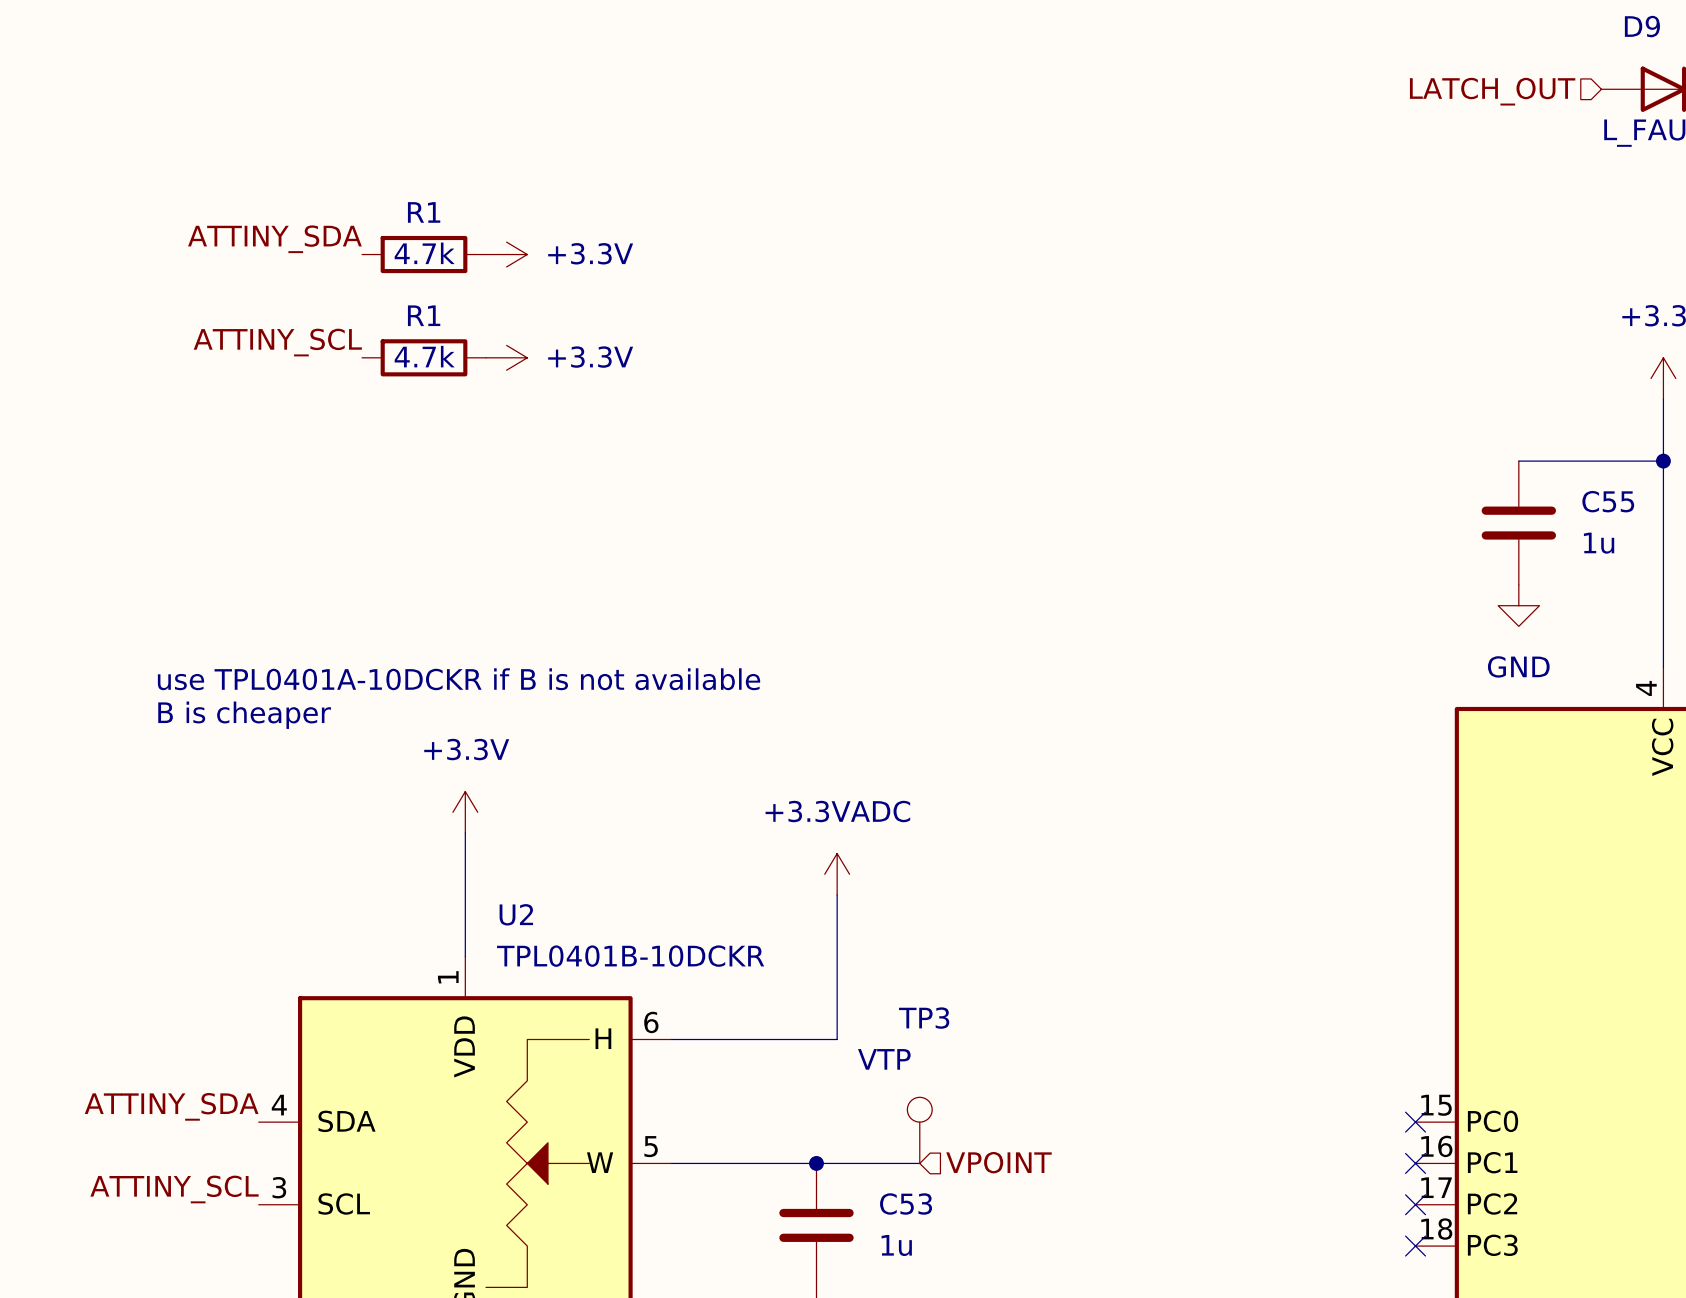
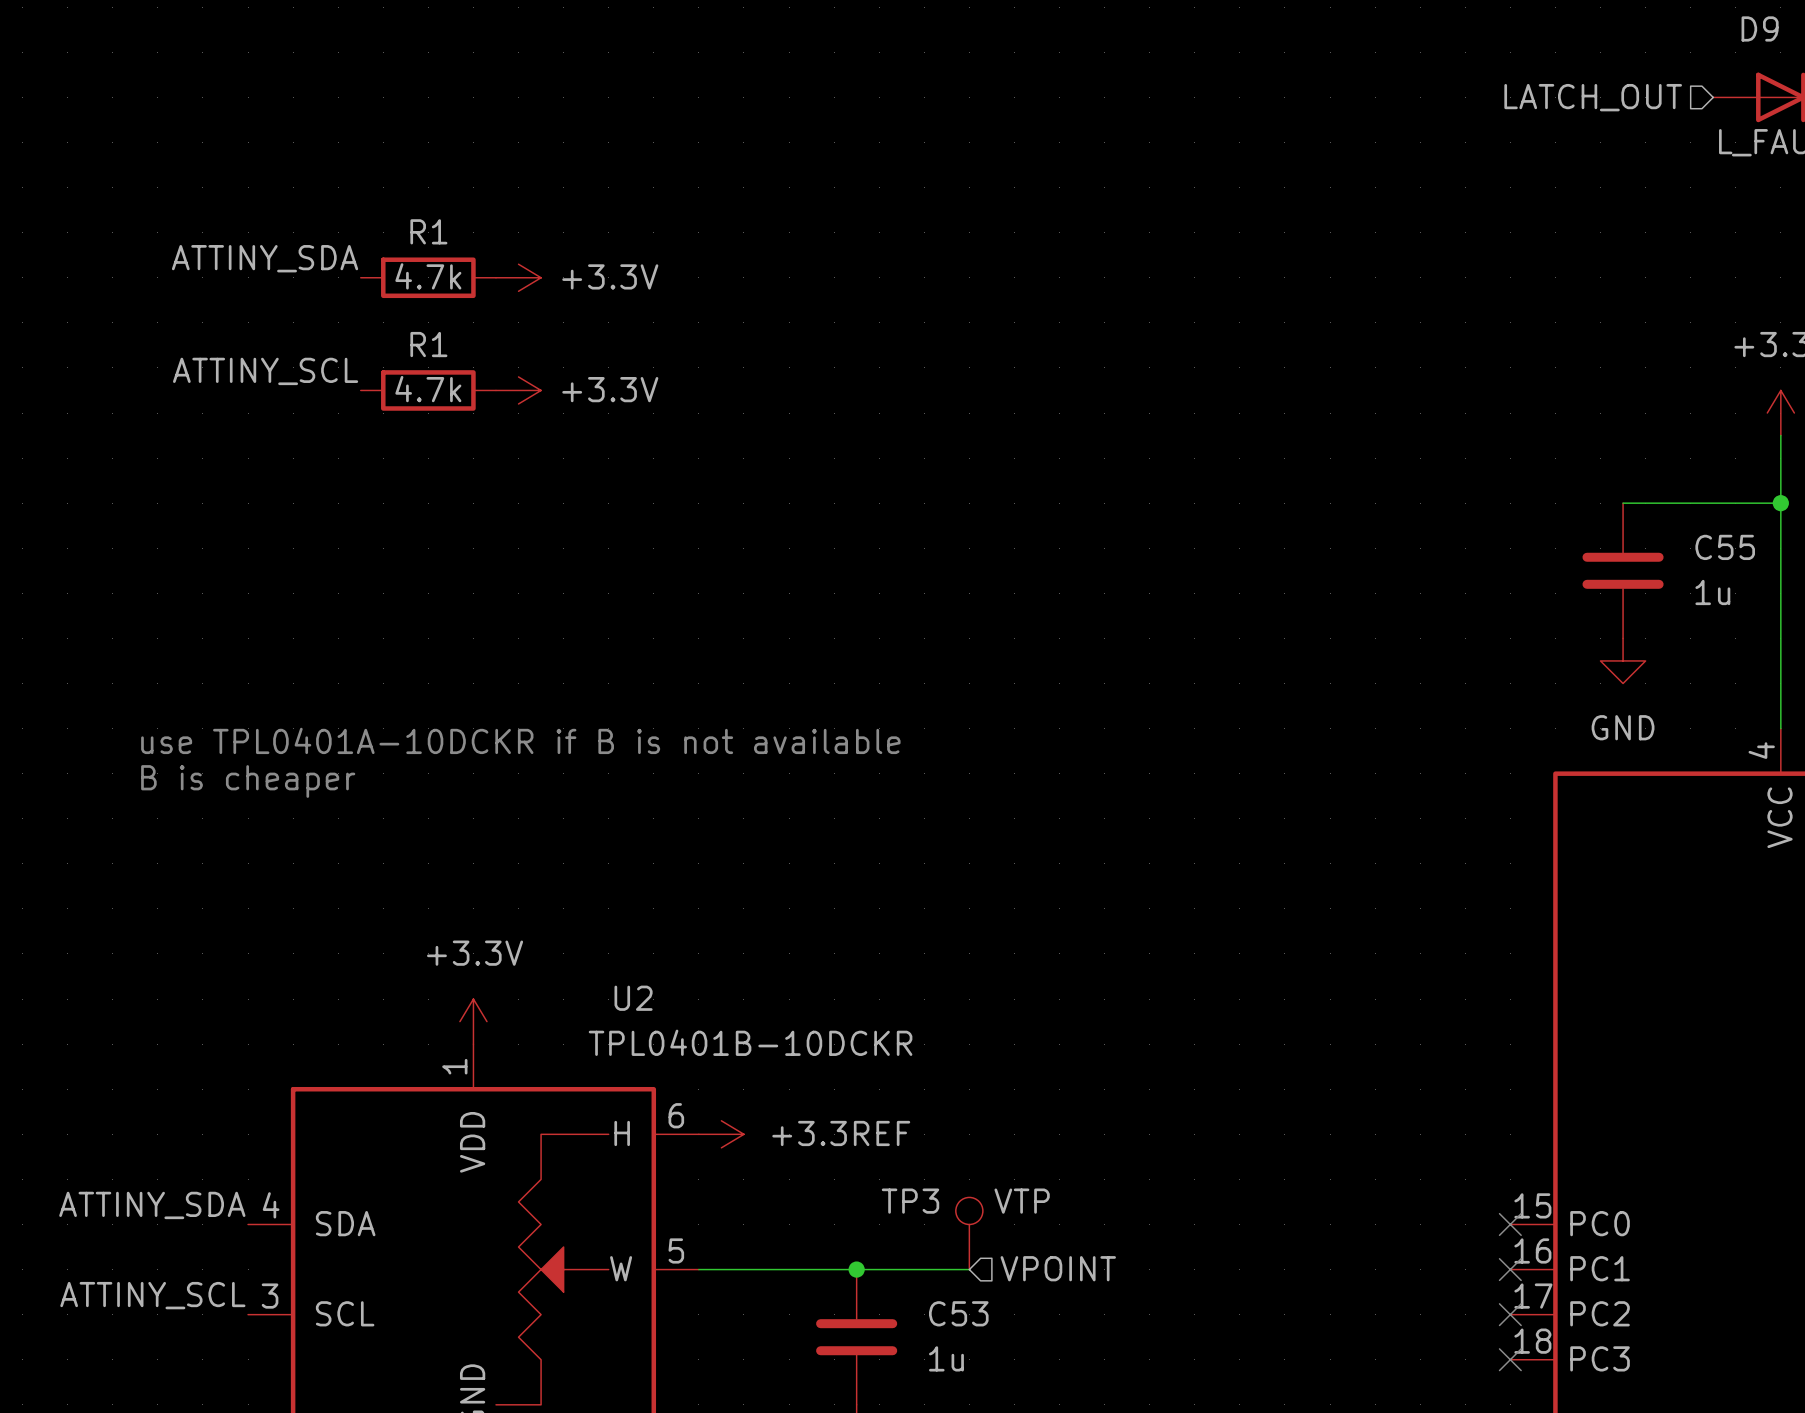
power symbol position: +3.3V (465, 812) -> +3.3V (473, 1021)
wire: (465, 832) (465, 956) -> none
power symbol: +3.3VADC (837, 874) -> none
wire: (837, 894) (837, 1039) (671, 1039) -> none
U2 name position: U2 (516, 914) -> U2 (633, 998)
U2 value position: TPL0401B-10DCKR (630, 956) -> TPL0401B-10DCKR (750, 1042)
TP3 name position: TP3 (924, 1018) -> TP3 (910, 1201)
power symbol: none -> +3.3REF (721, 1134)
TP3 value position: VTP (884, 1059) -> VTP (1022, 1201)

